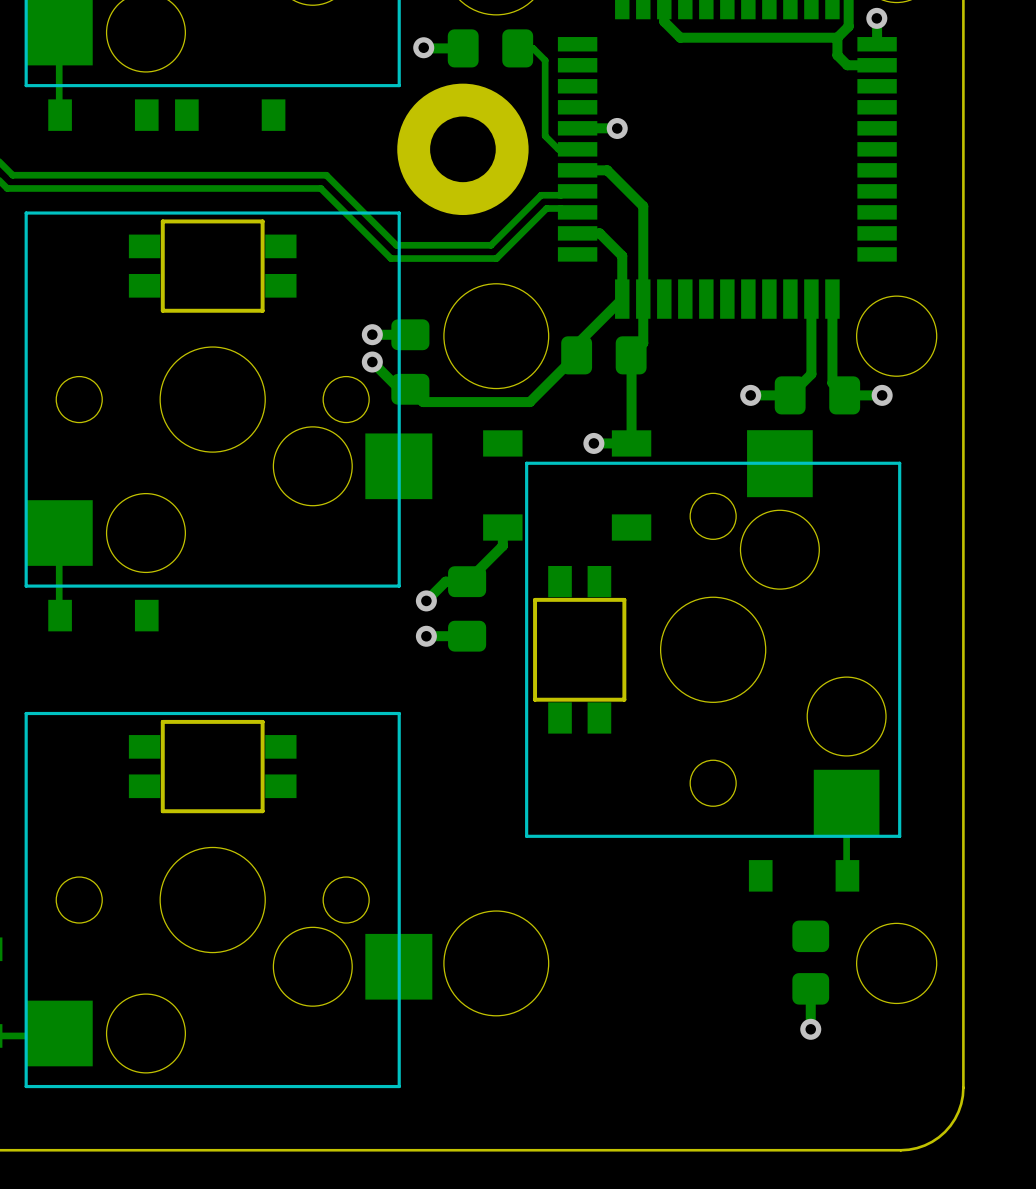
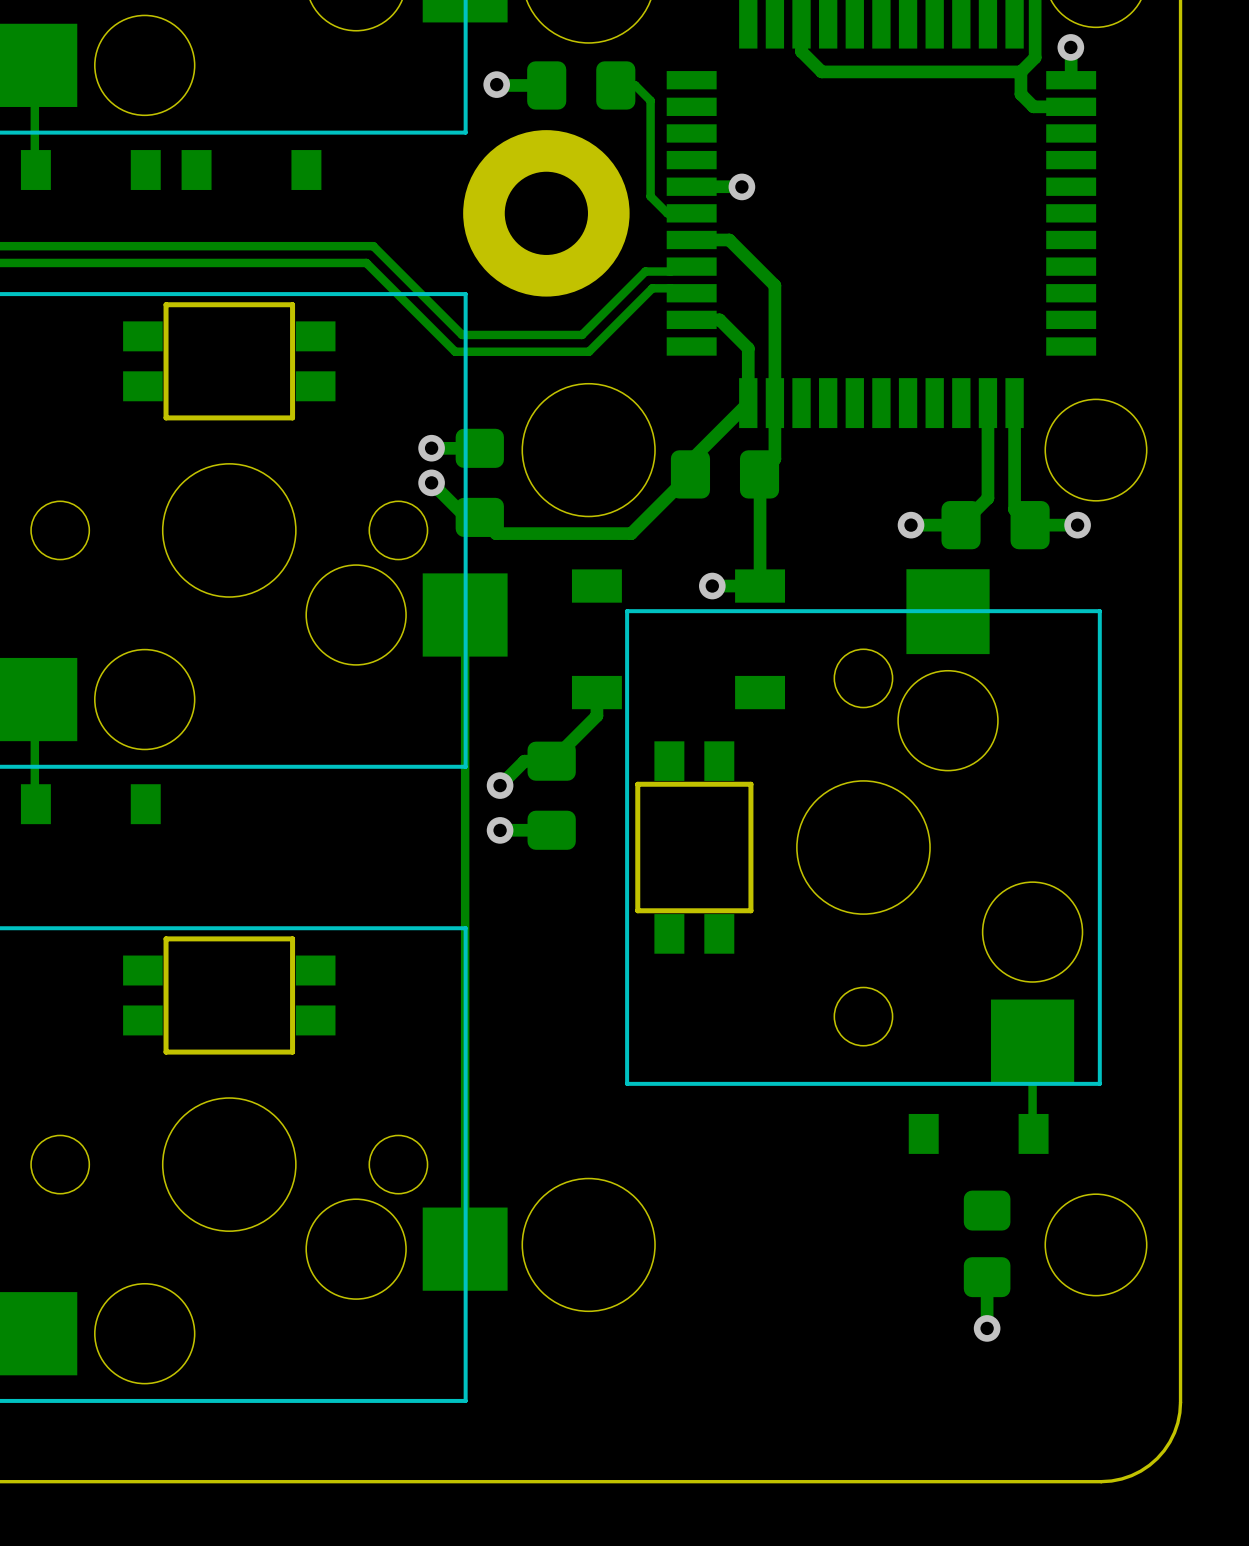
bottom track: none -> (465, 614) (465, 1249)

